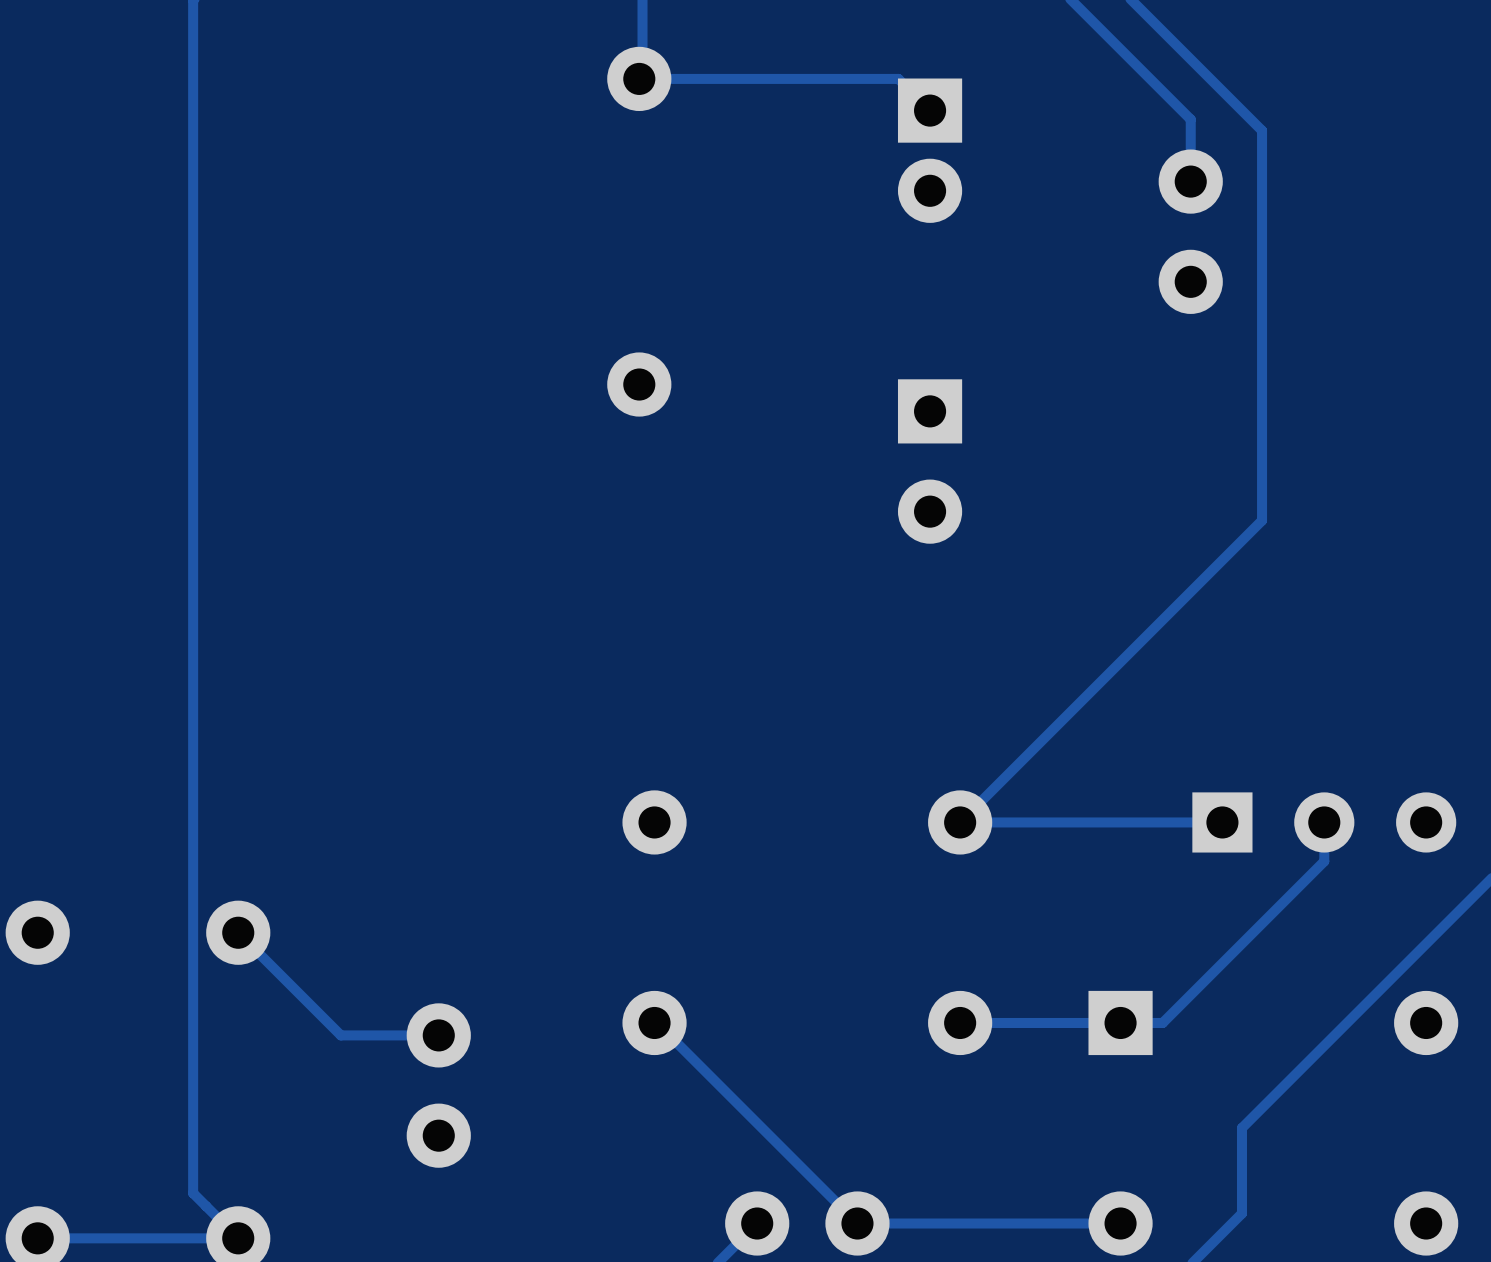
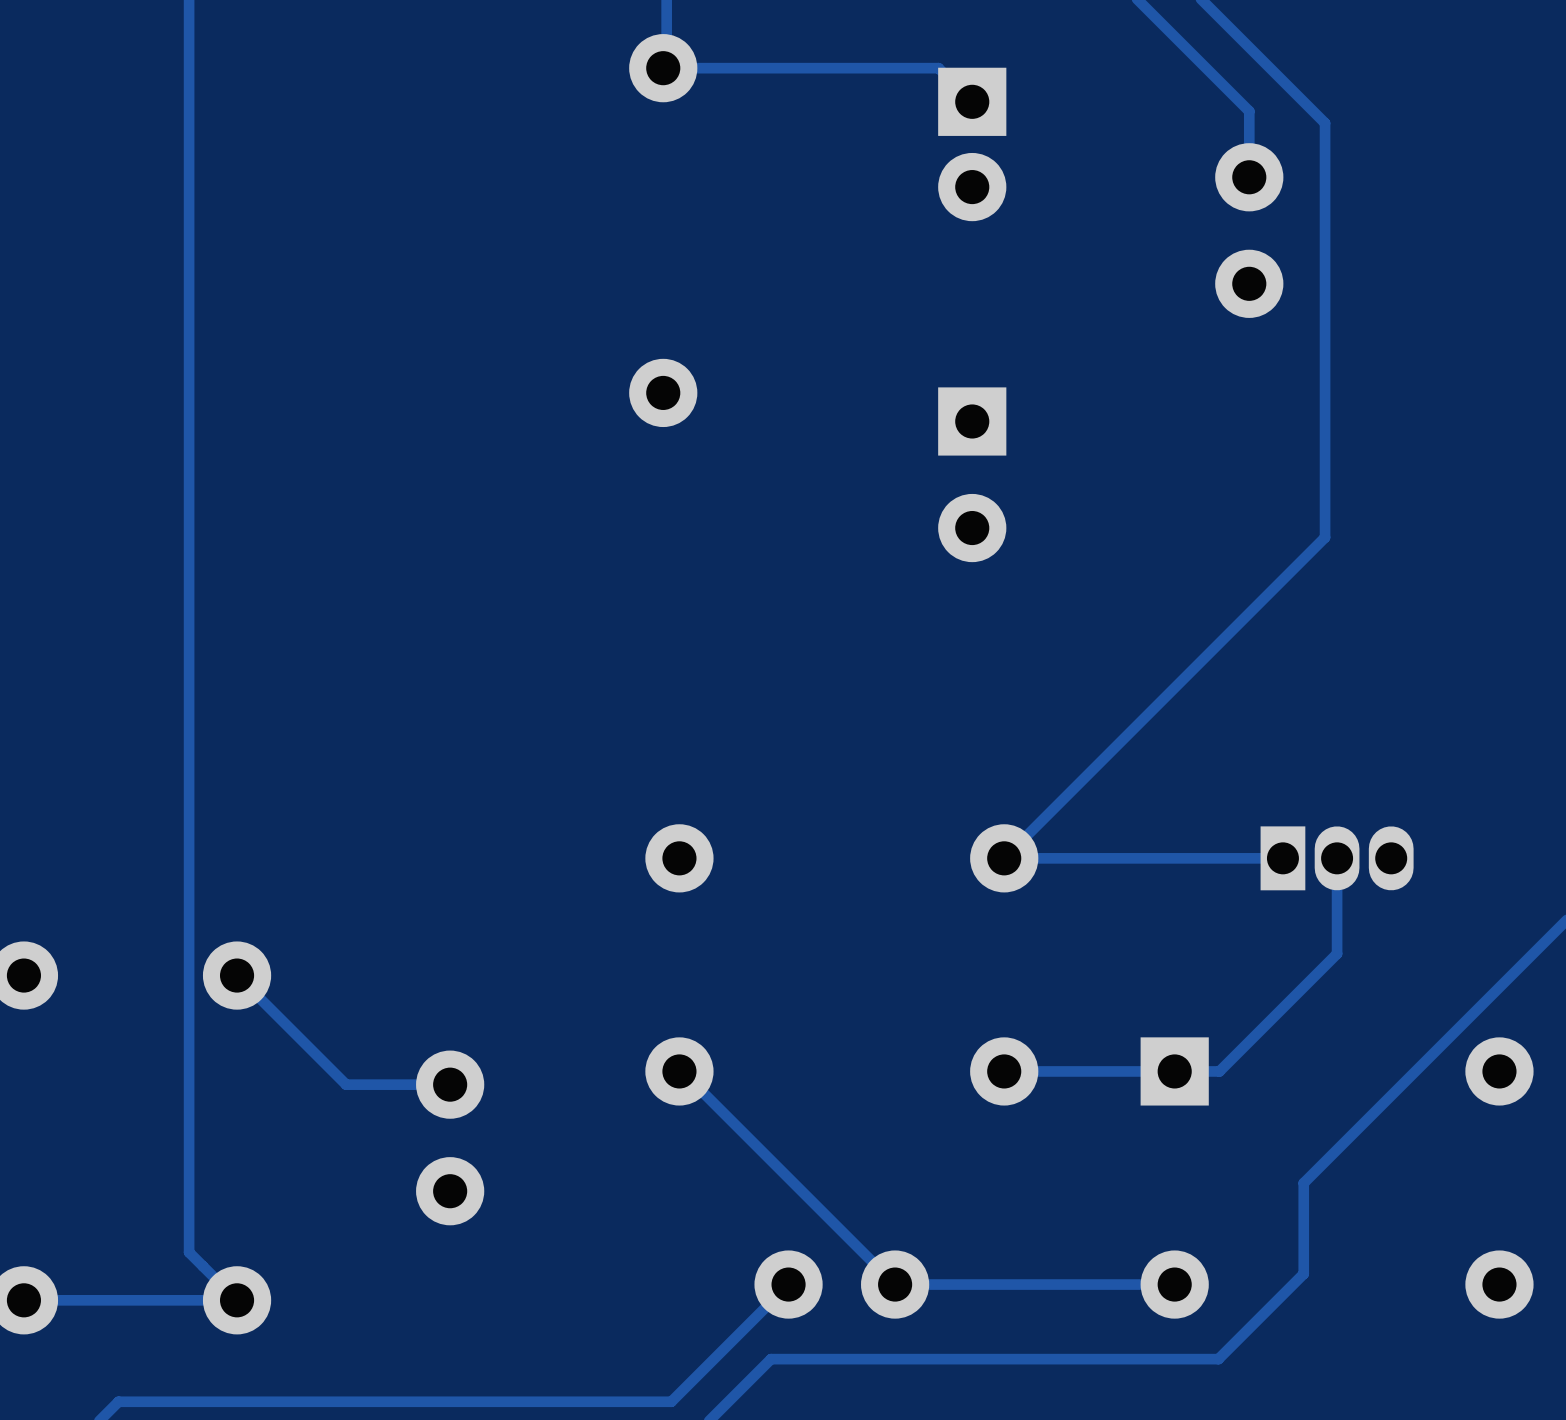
part: none -> (1337, 858)
track: (1324, 822) (1324, 861) (1273, 912) -> (1337, 858) (1337, 953)
part: (1324, 822) -> none

